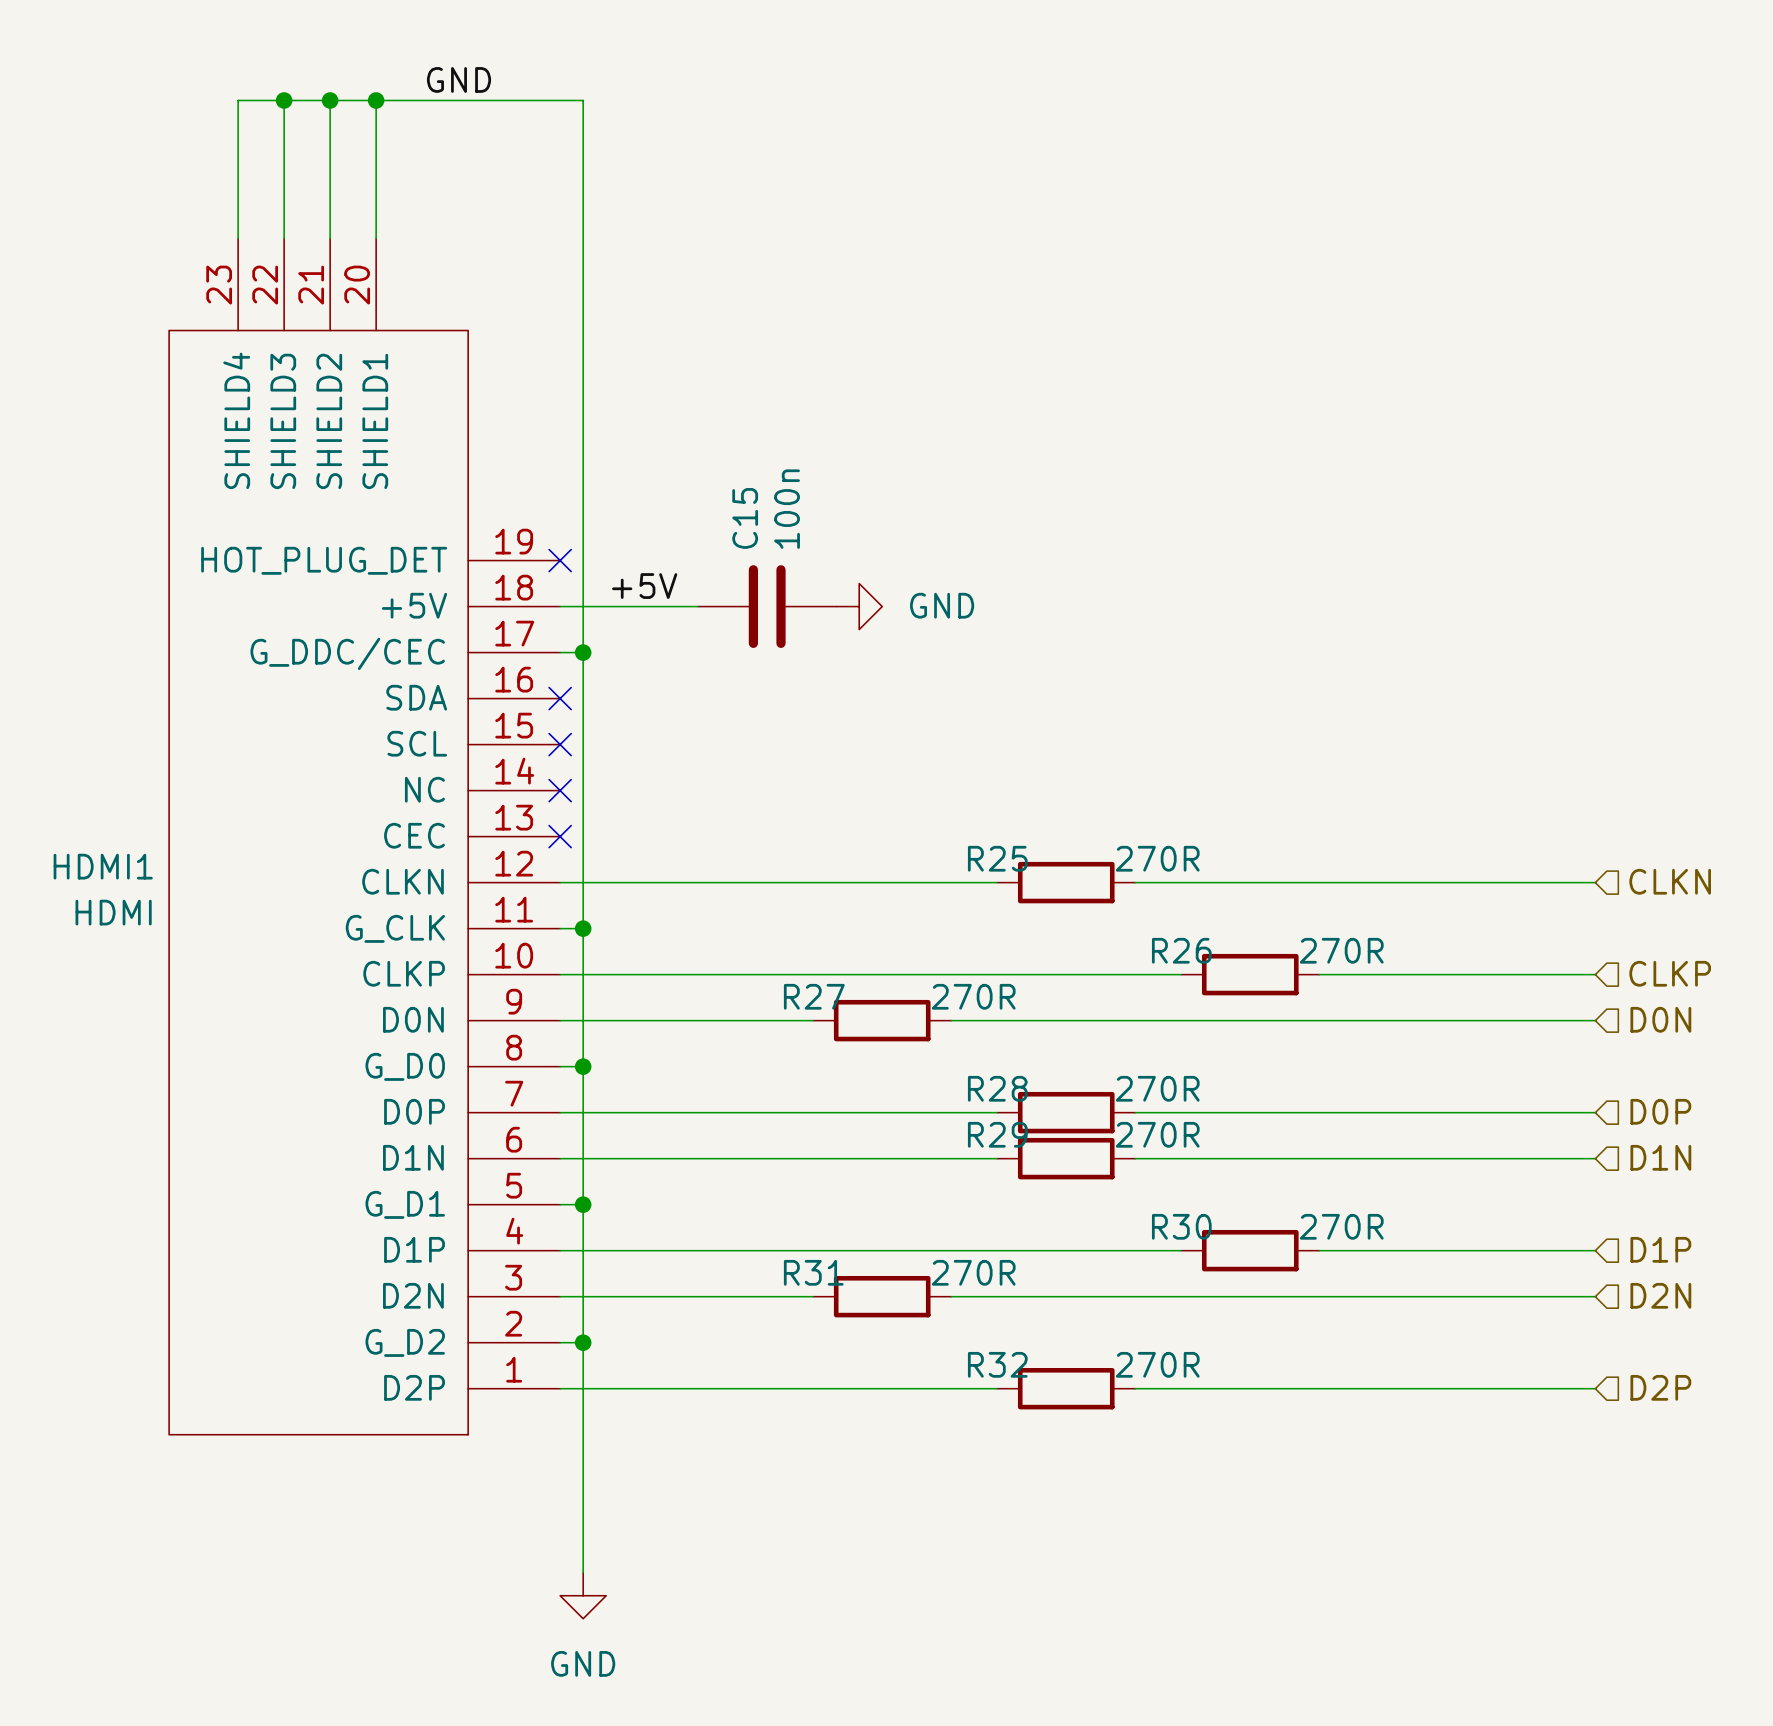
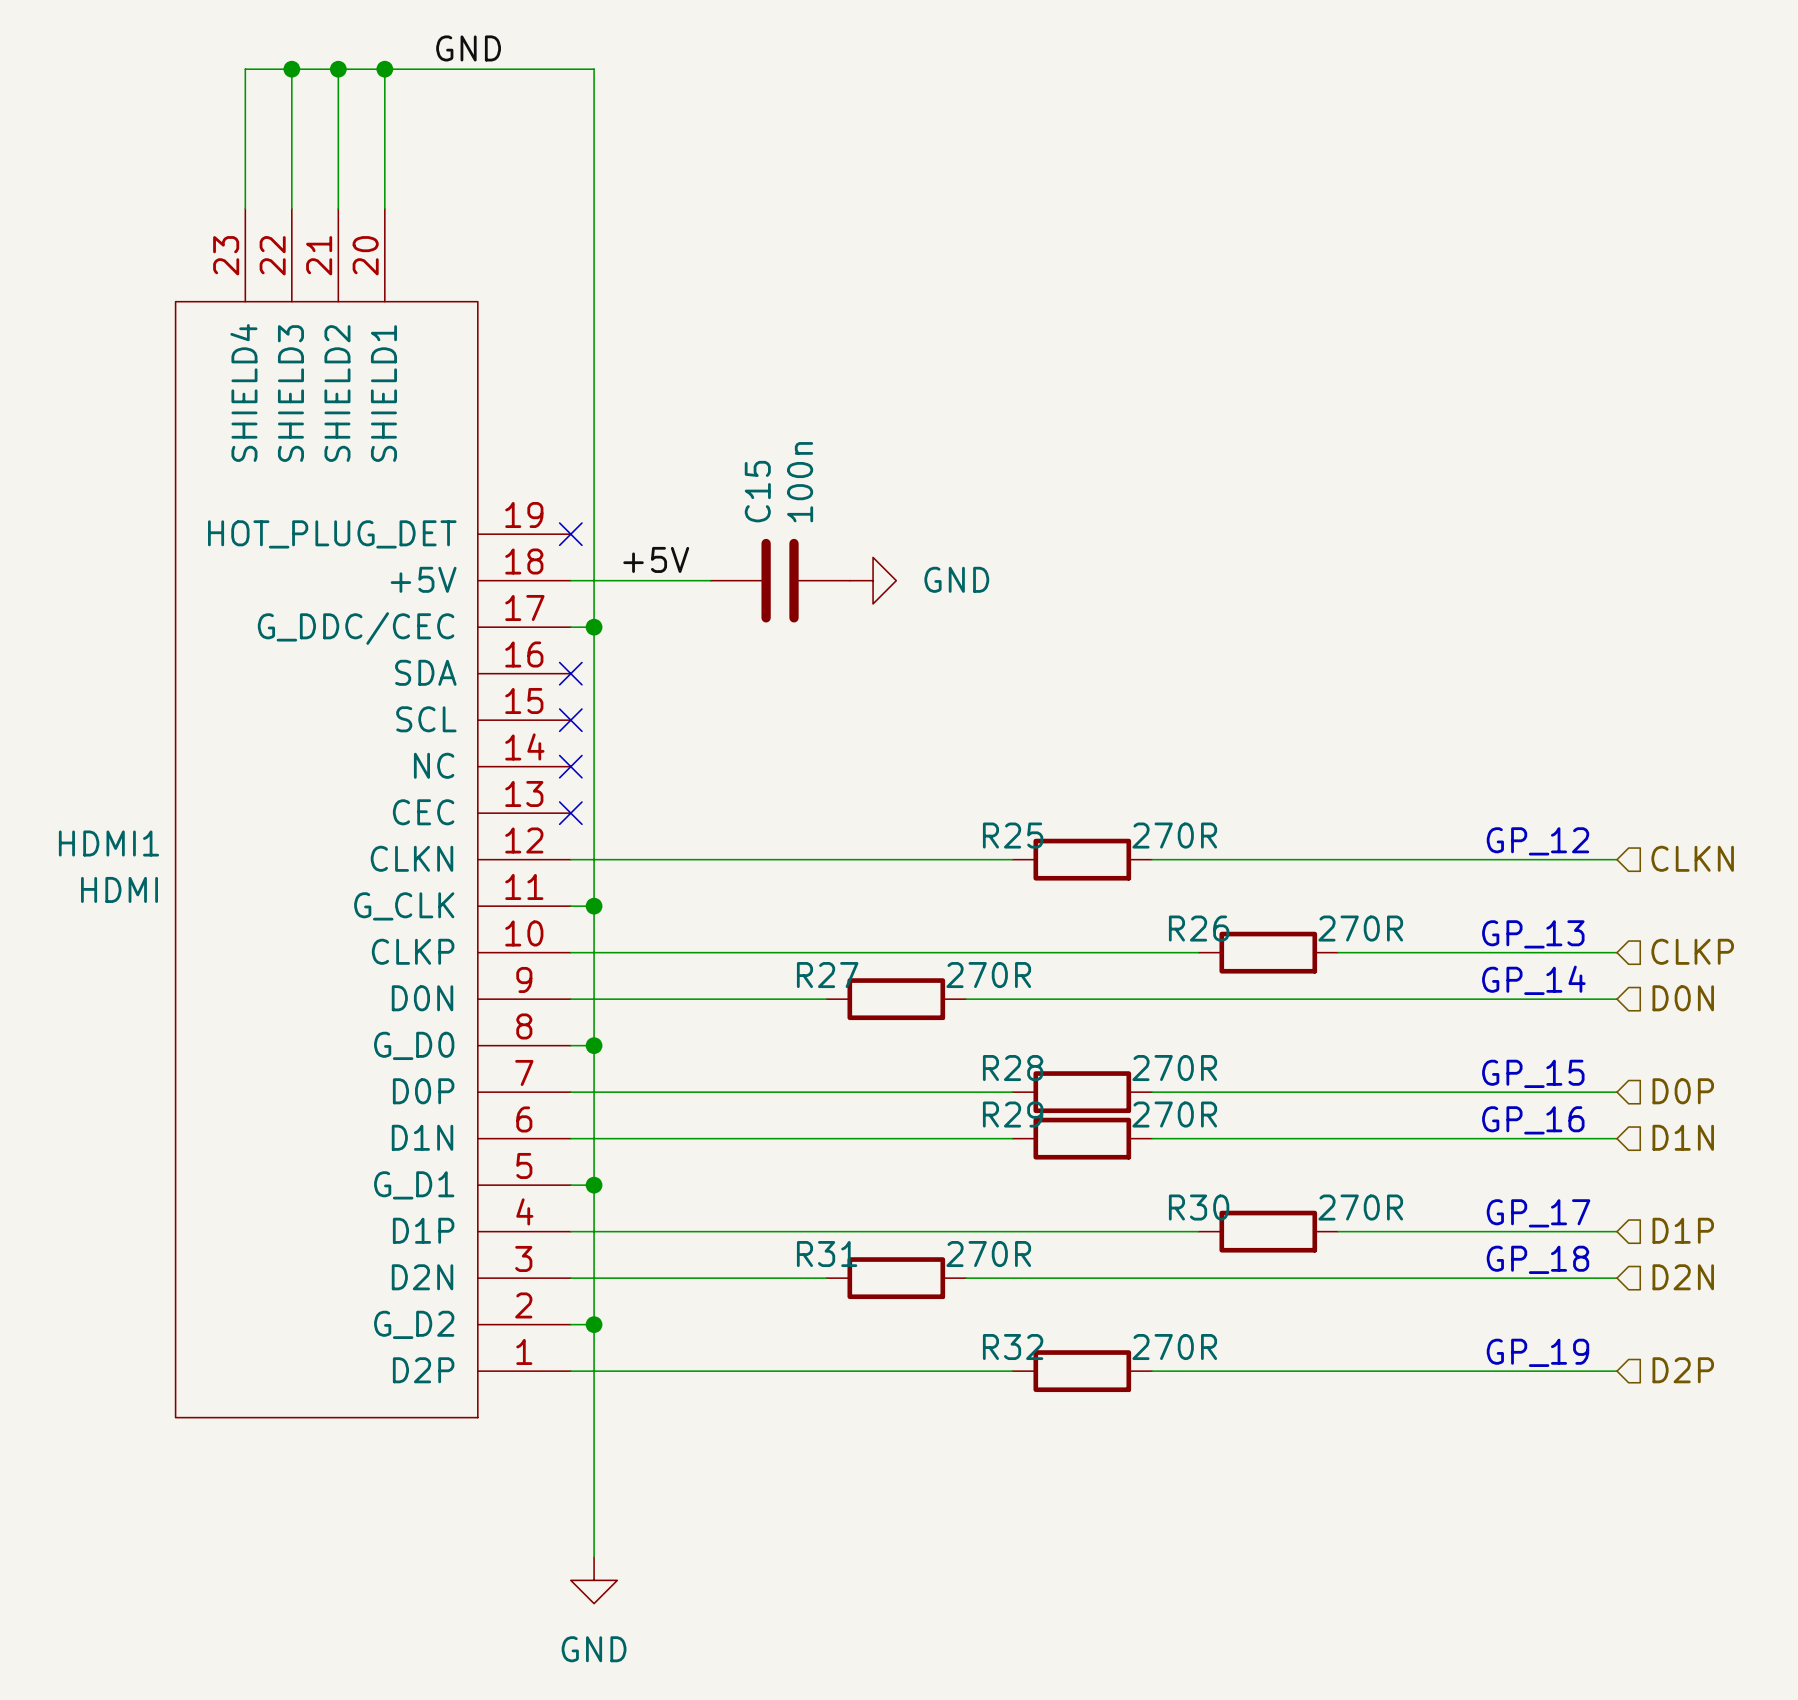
text: none -> GP_12 (1537, 841)
text: none -> GP_13 (1533, 934)
text: none -> GP_14 (1533, 980)
text: none -> GP_15 (1533, 1073)
text: none -> GP_16 (1533, 1120)
text: none -> GP_17 (1538, 1213)
text: none -> GP_18 (1537, 1259)
text: none -> GP_19 (1537, 1352)

